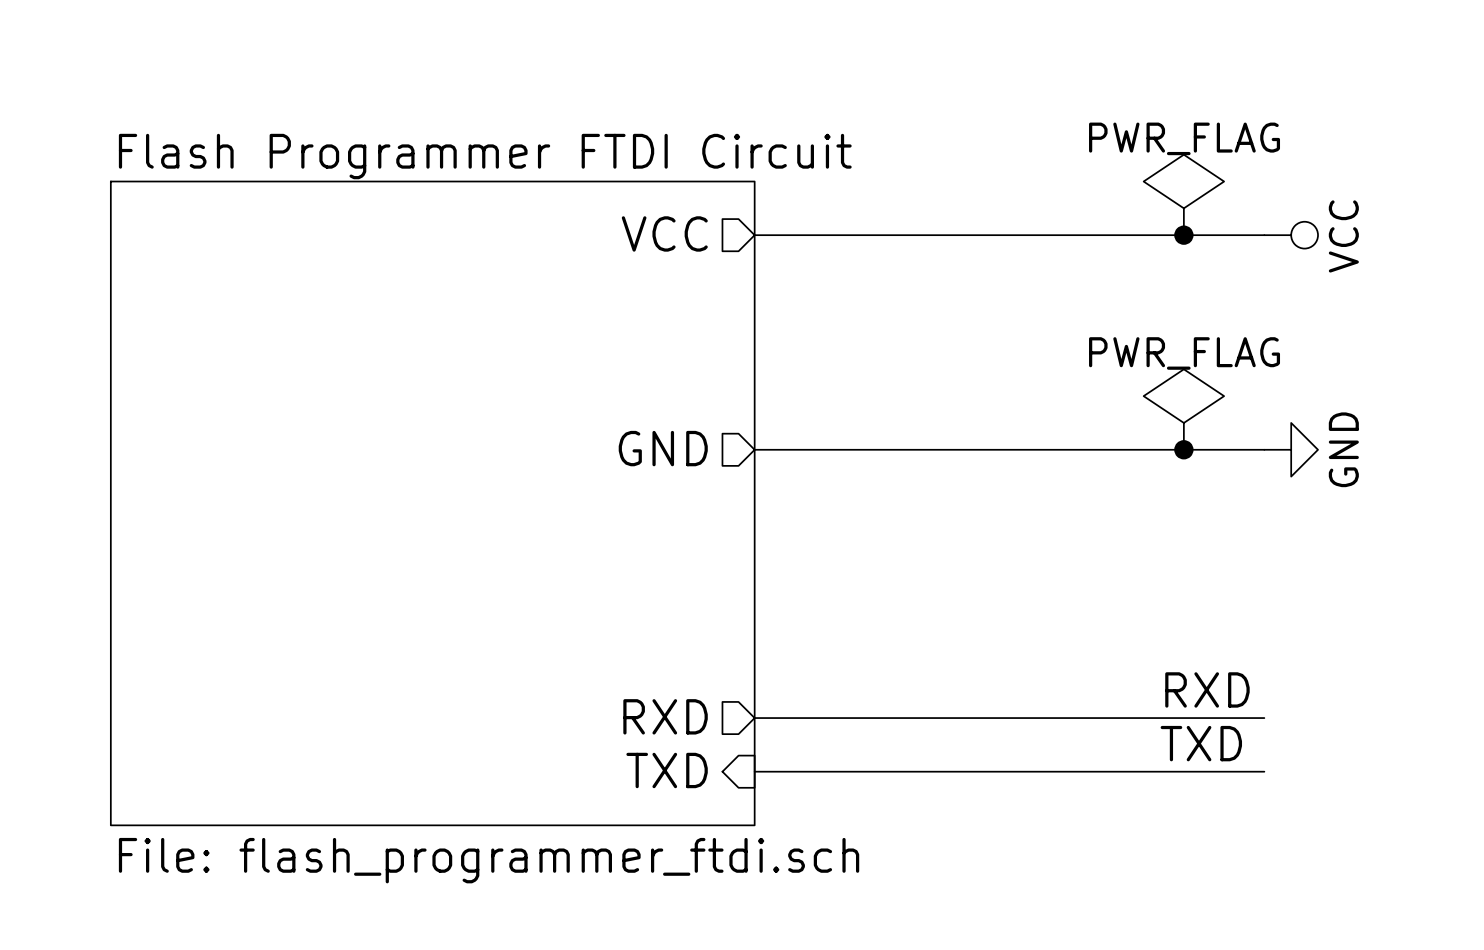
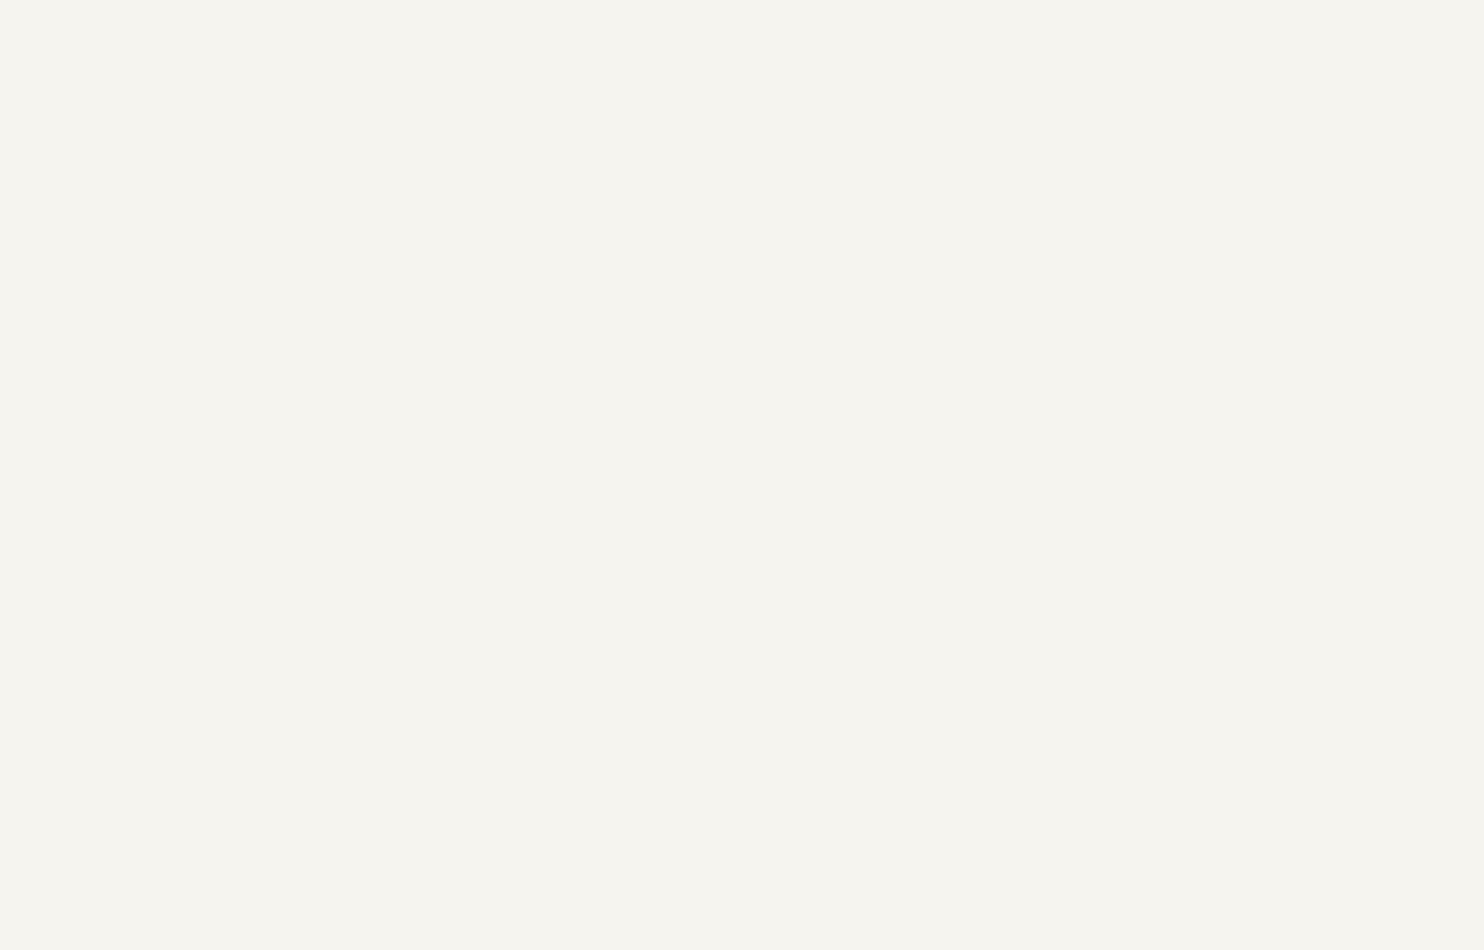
power symbol: PWR_FLAG (1183, 194) -> none
sheet pin: VCC (664, 233) -> none
wire: (754, 235) (1264, 235) -> none
junction: (1183, 235) -> none
power symbol: VCC (1291, 235) -> none
power symbol: PWR_FLAG (1183, 409) -> none
sheet pin: GND (663, 448) -> none
wire: (754, 449) (1264, 449) -> none
junction: (1183, 449) -> none
power symbol: GND (1291, 449) -> none
sheet Flash Programmer FTDI Circuit: File: flash_programmer_ftdi.sch (432, 503) -> none
label: RXD (1207, 689) -> none
sheet pin: RXD (665, 716) -> none
wire: (754, 718) (1264, 718) -> none
label: TXD (1201, 743) -> none
sheet pin: TXD (667, 770) -> none
wire: (754, 771) (1264, 771) -> none

